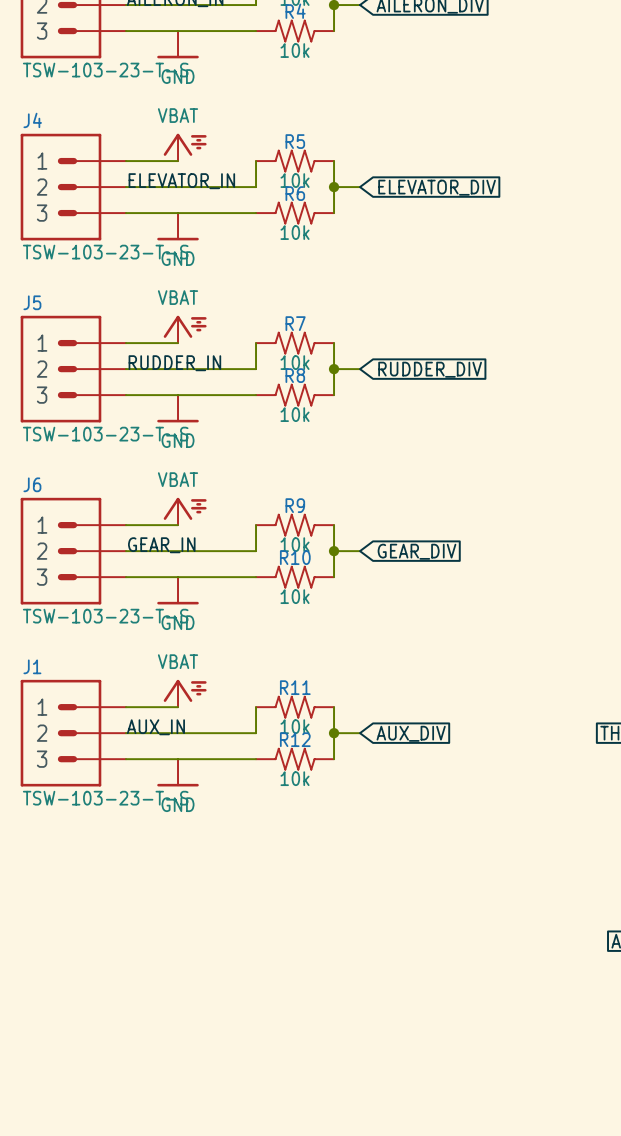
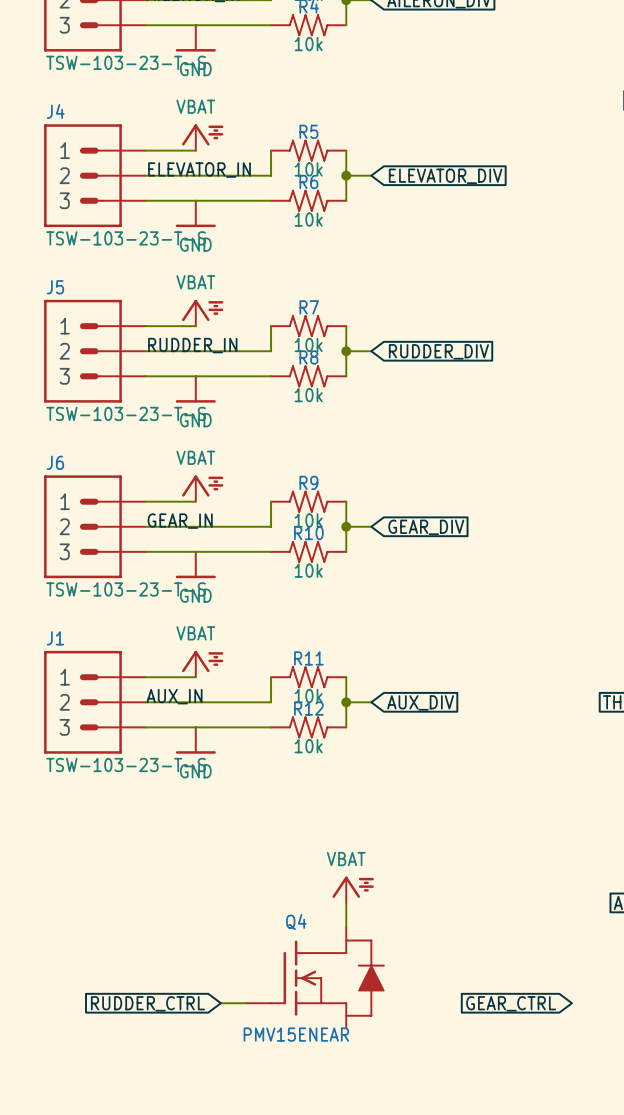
power symbol: none -> VBAT (353, 889)
wire: none -> (346, 902) (346, 927)
Q4: none -> (315, 978)
global label: none -> RUDDER_CTRL (147, 1003)
wire: none -> (220, 1003) (245, 1003)
global label: none -> GEAR_CTRL (511, 1003)

